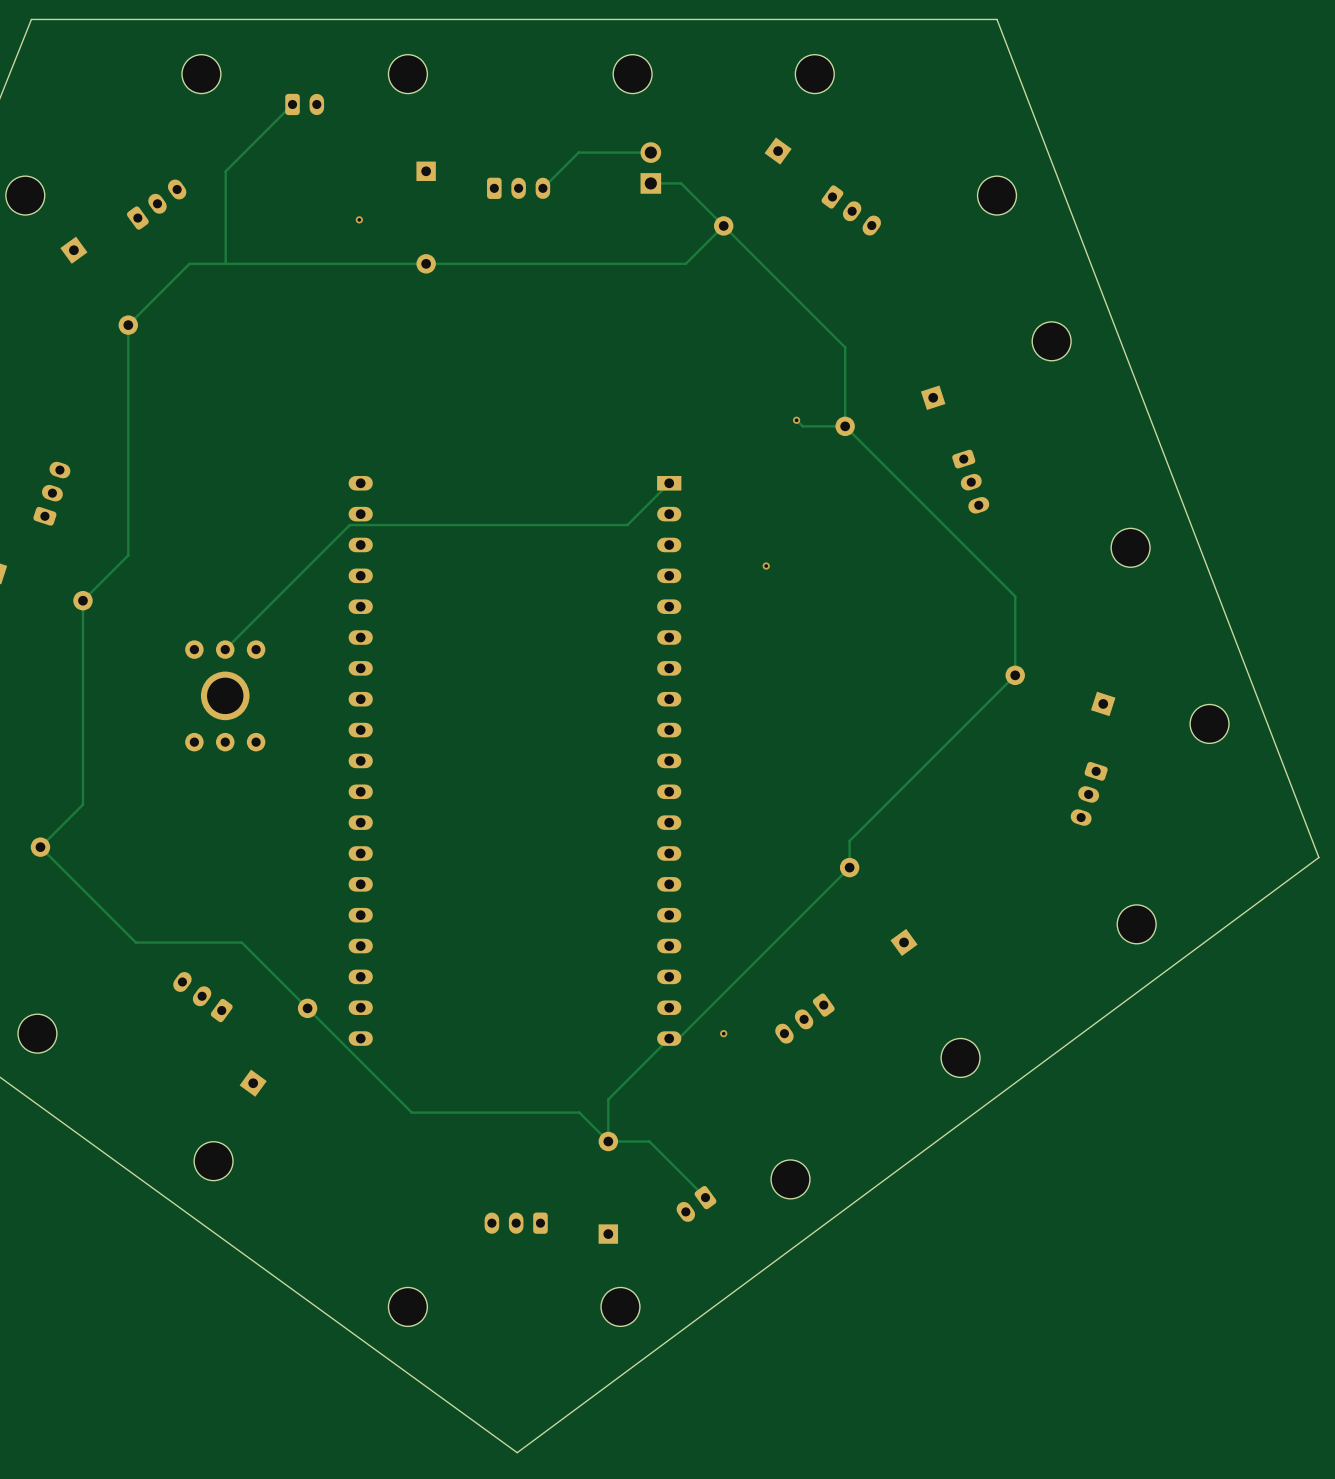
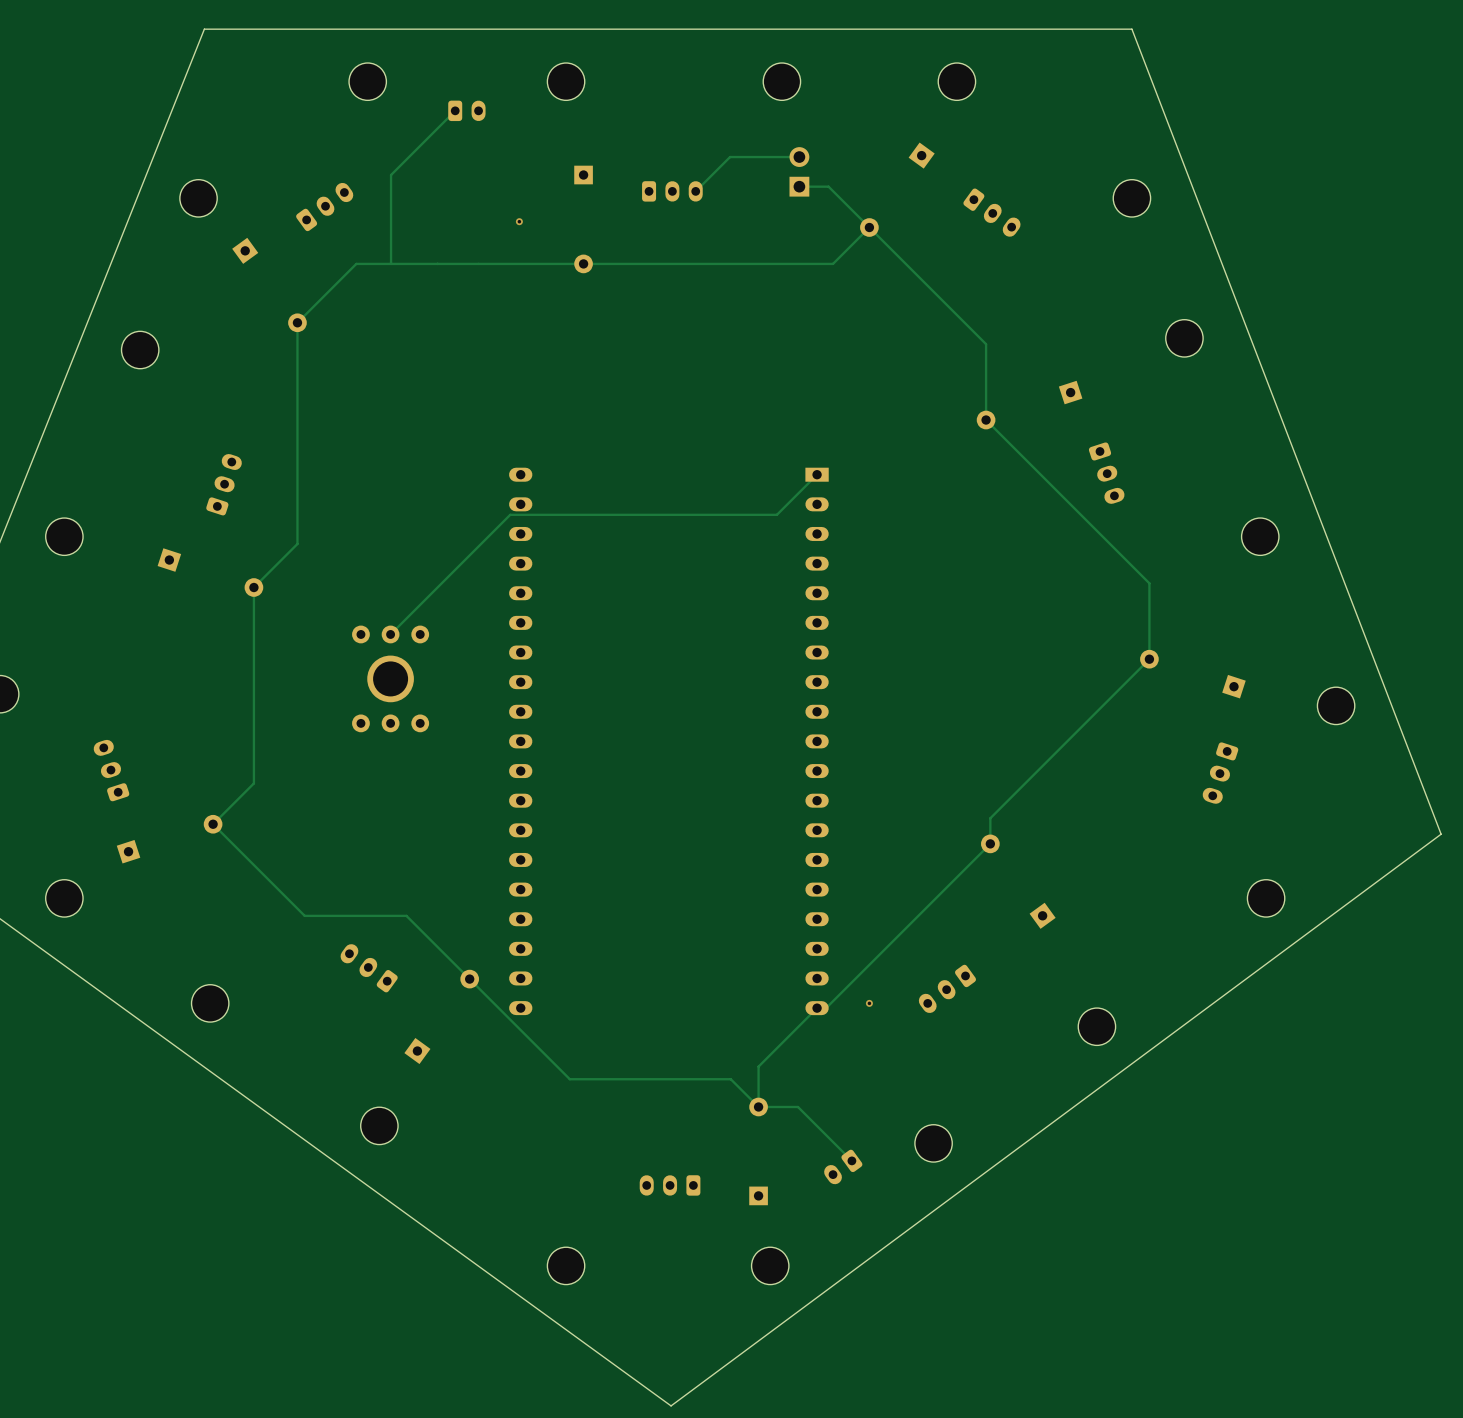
track: (796, 420) (802, 426) (845, 426) -> none
via: (796, 420) -> none
via: (766, 566) -> none

